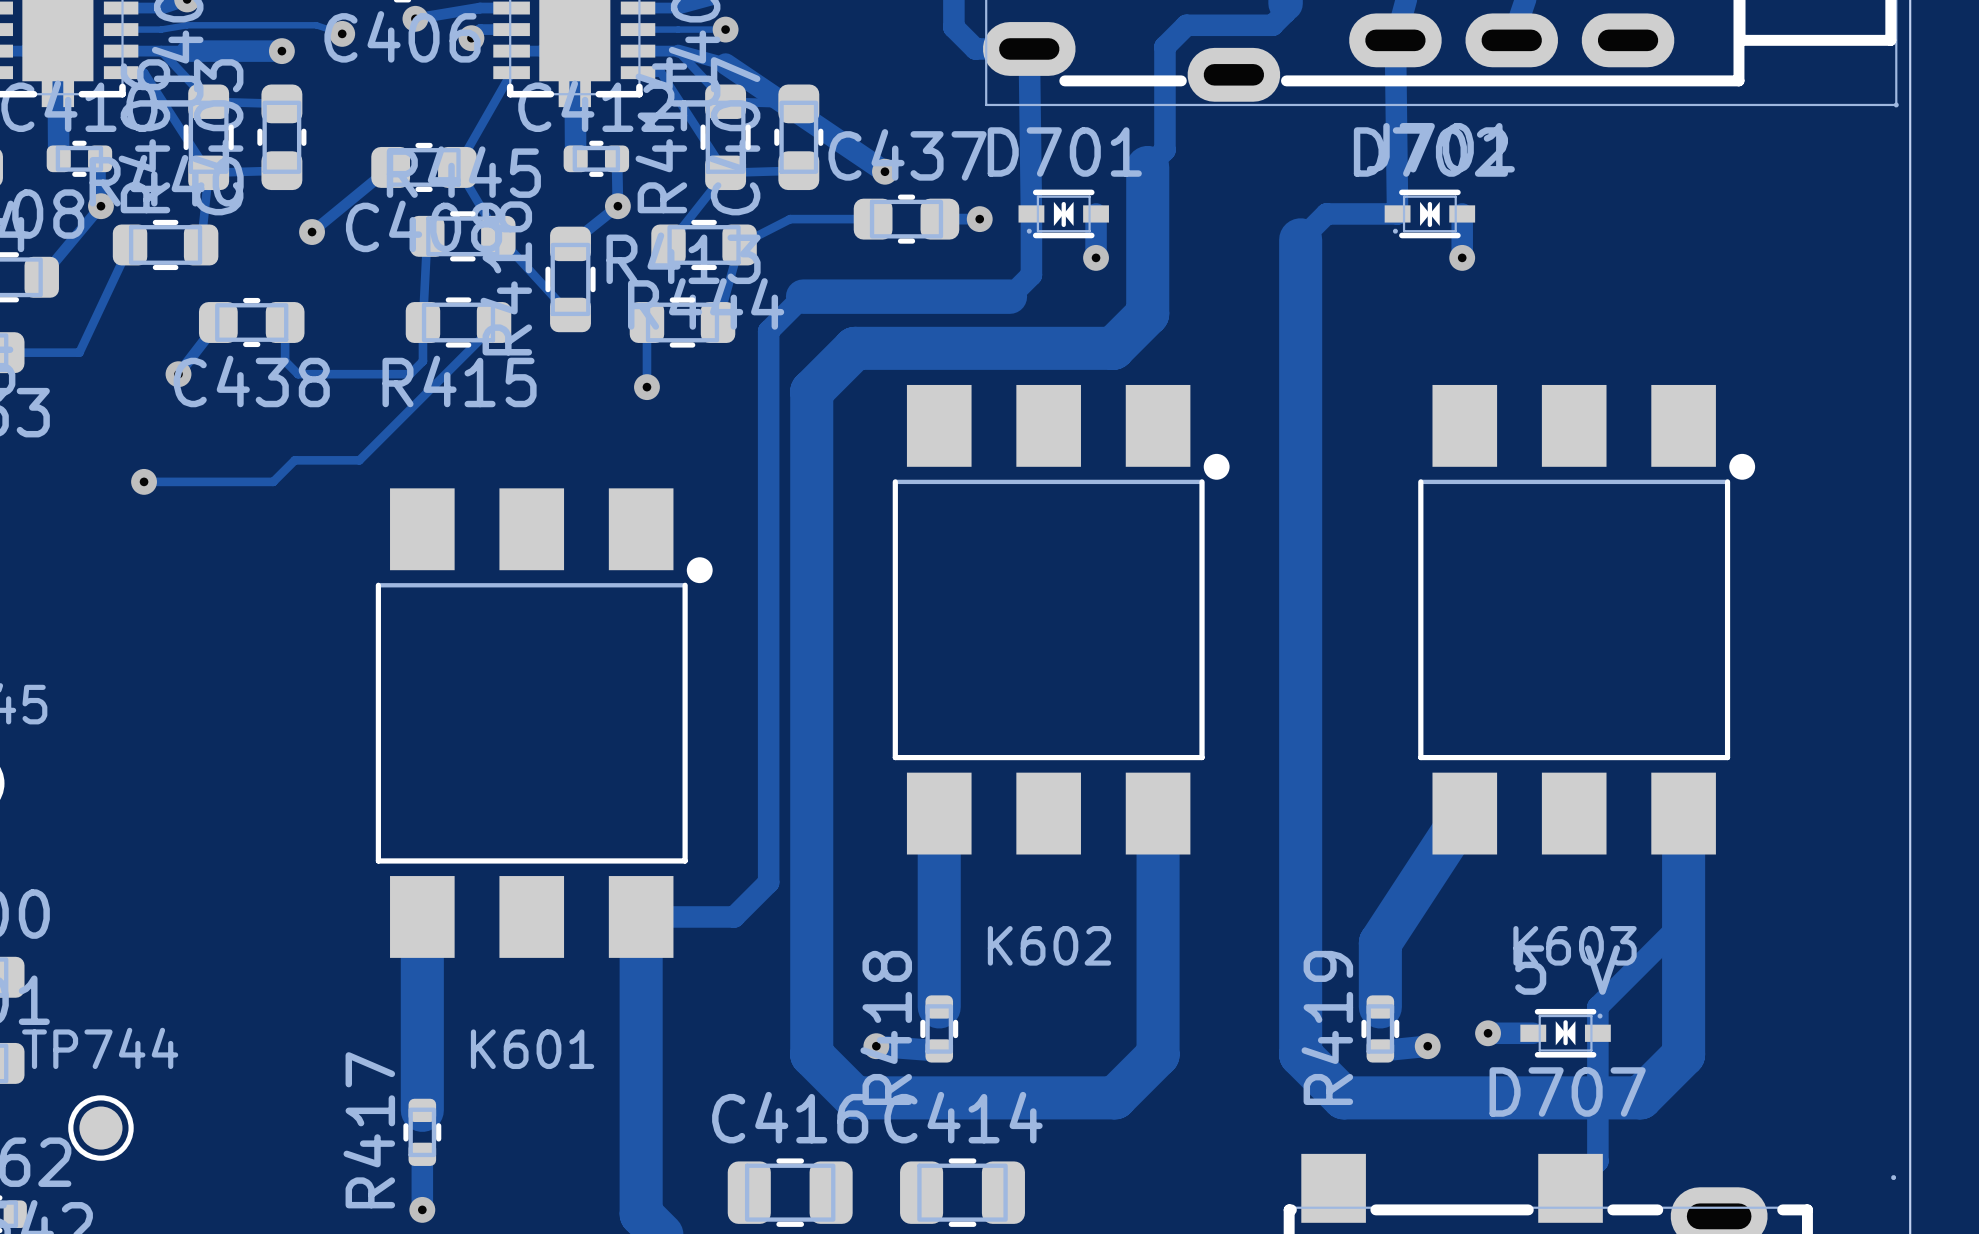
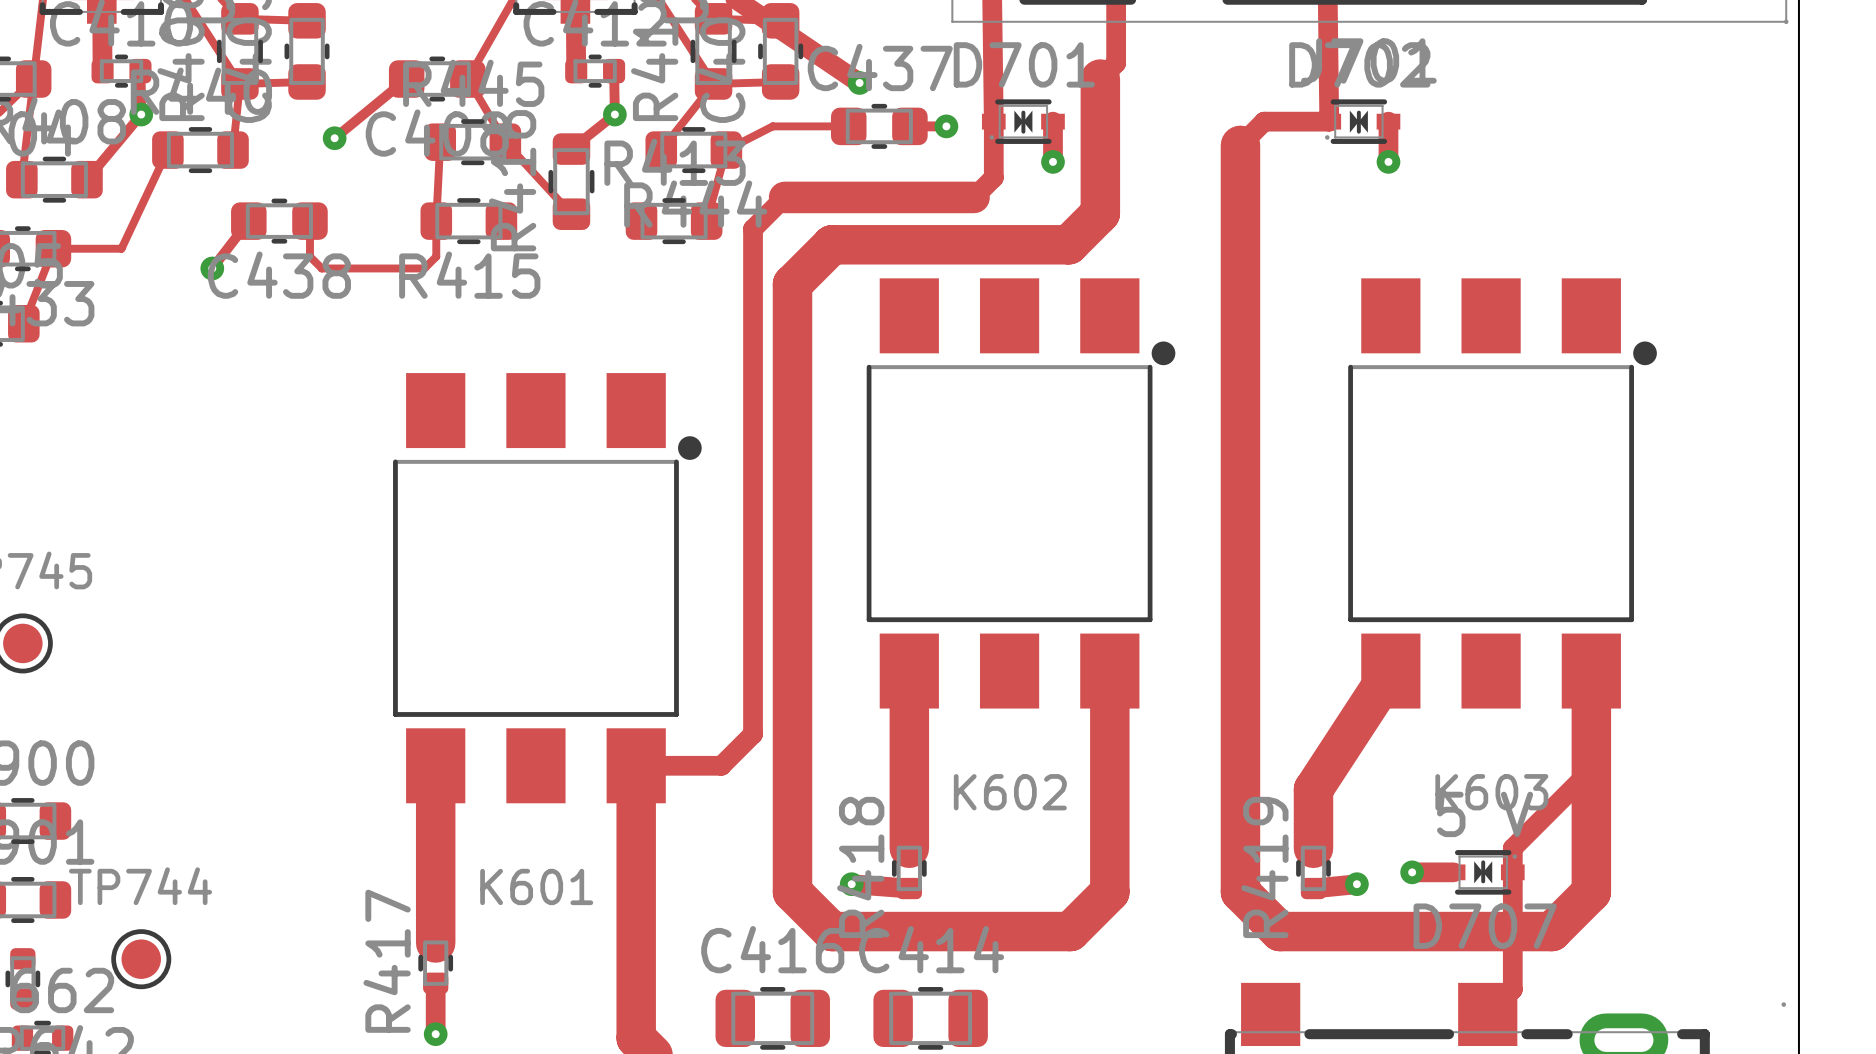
track: (494, 322) (494, 325) (359, 460) (294, 460) (273, 481) (144, 481) -> none
track: (646, 322) (646, 387) -> none
via: (646, 387) -> none
via: (144, 481) -> none

